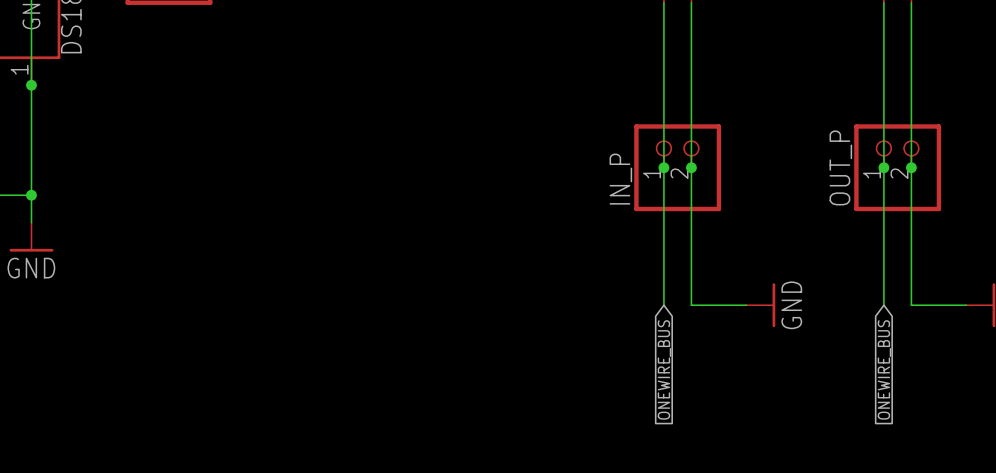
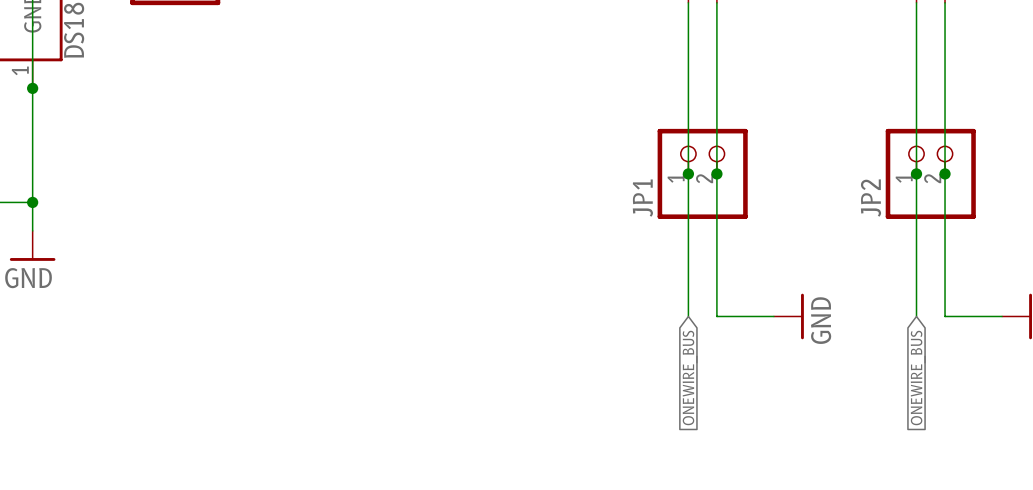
OUT_P name: OUT_P (840, 167) -> JP2 (871, 198)
IN_P name: IN_P (620, 179) -> JP1 (642, 198)

